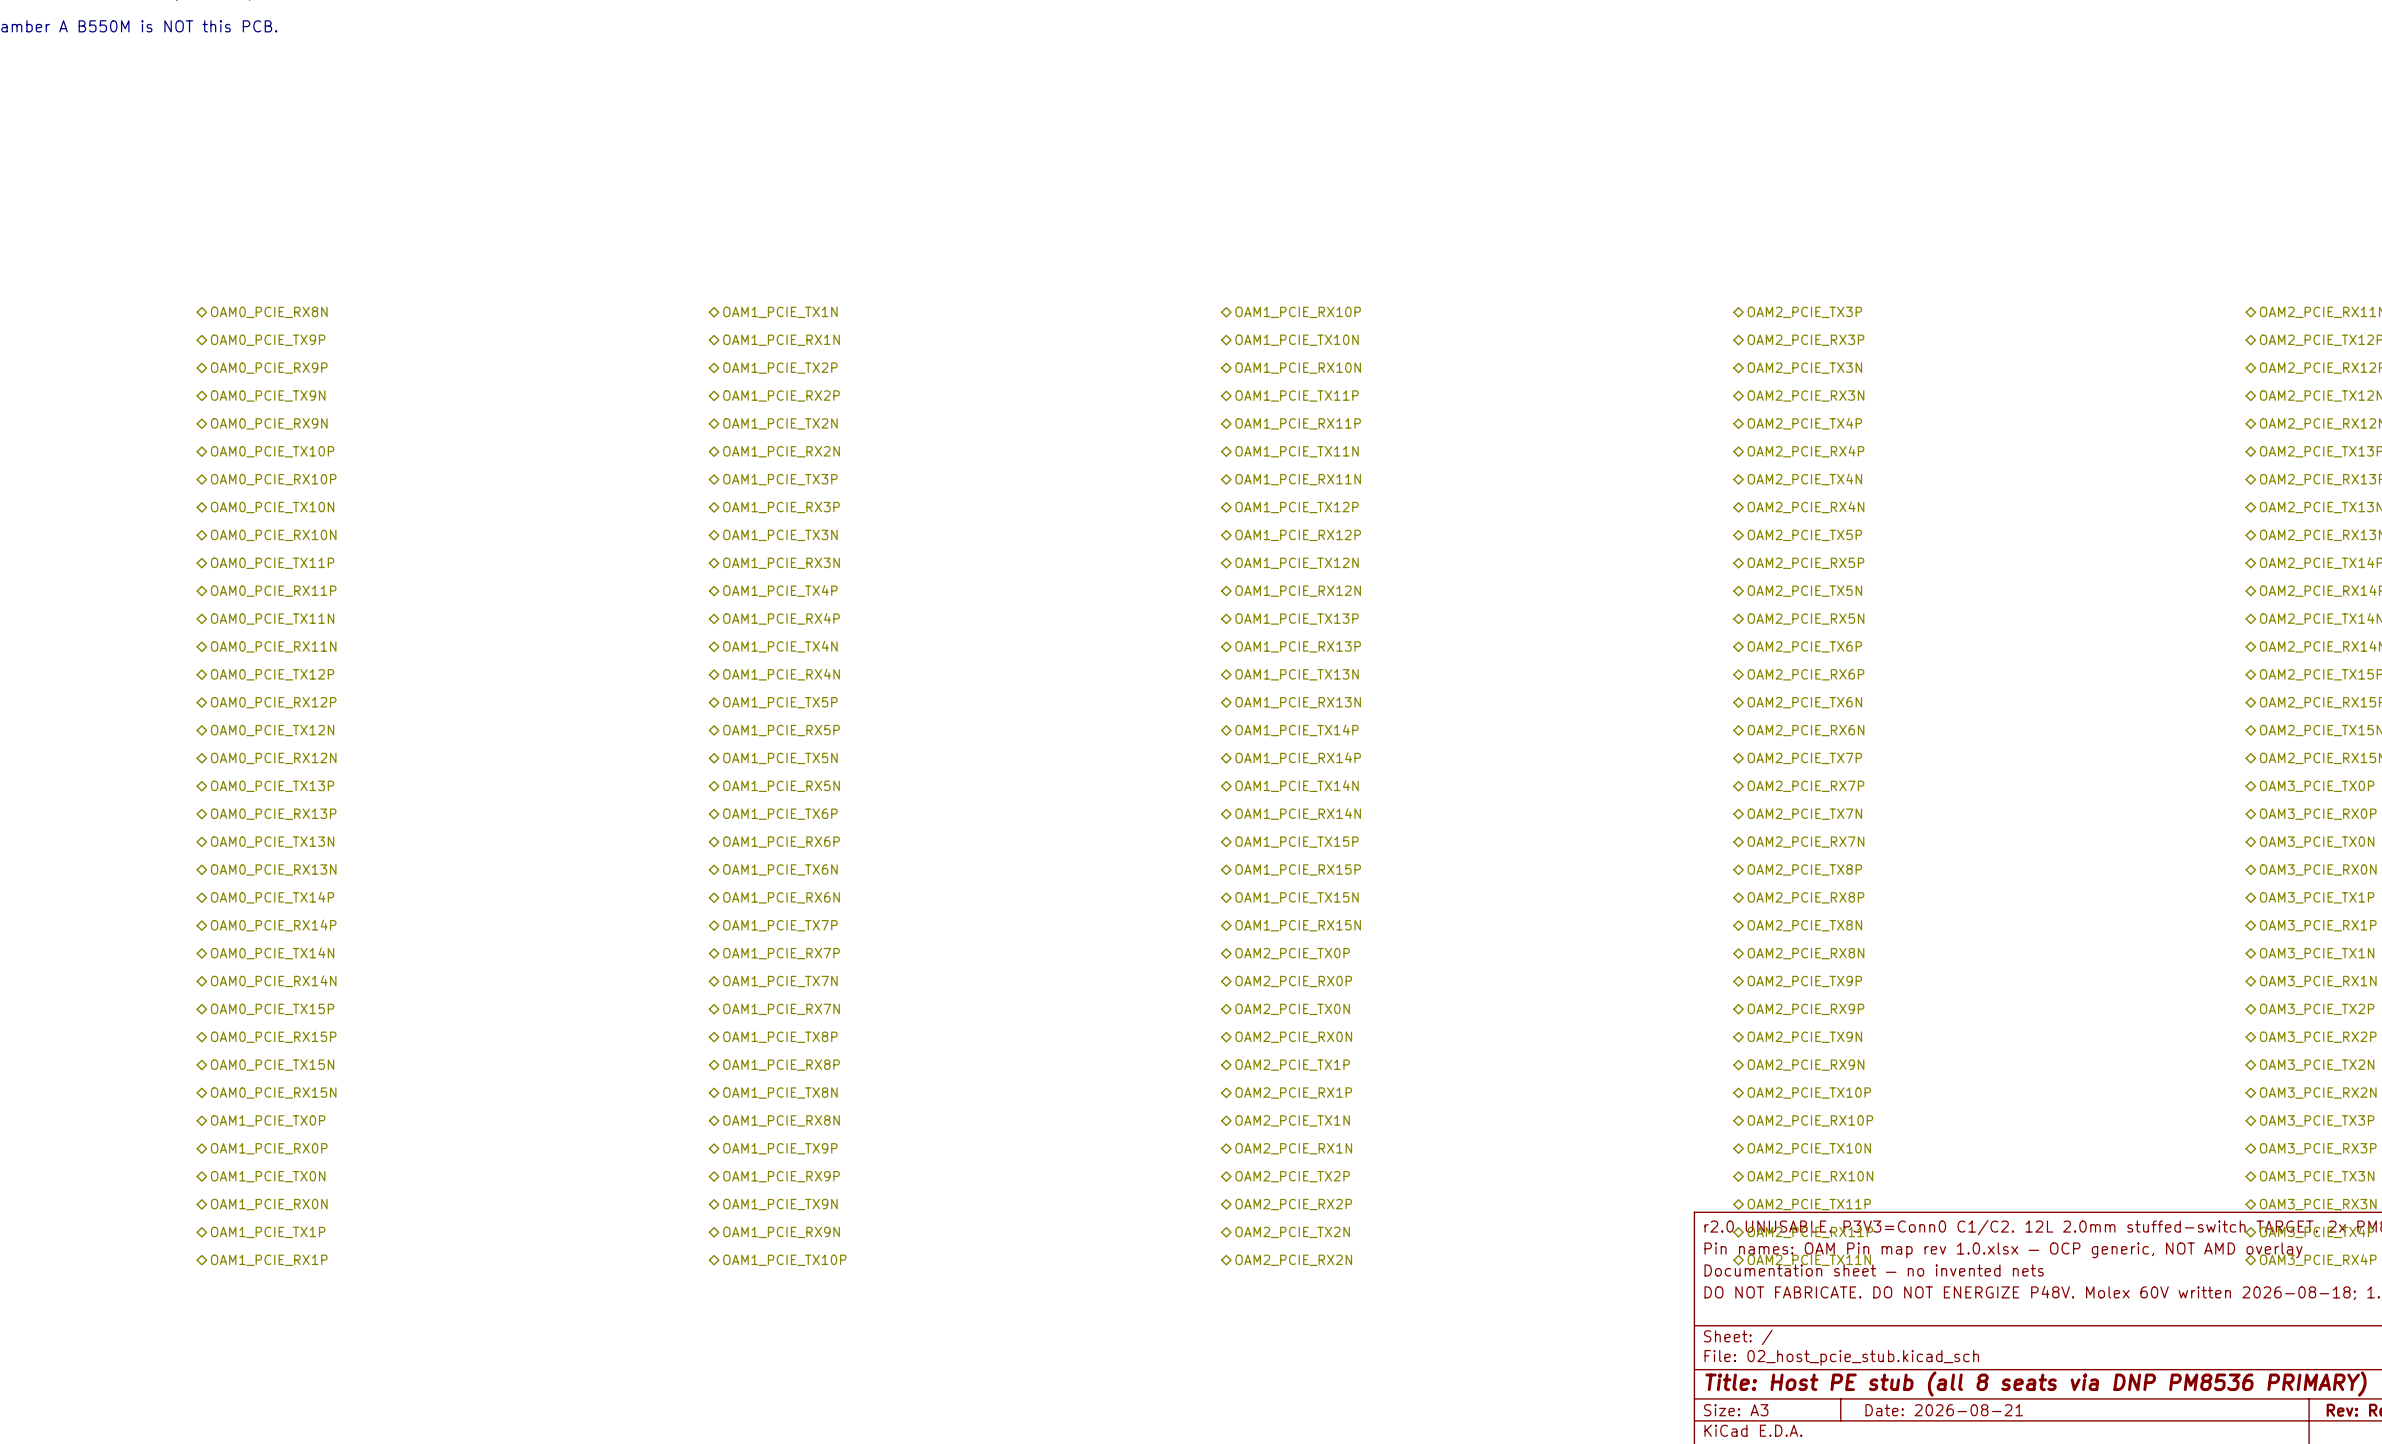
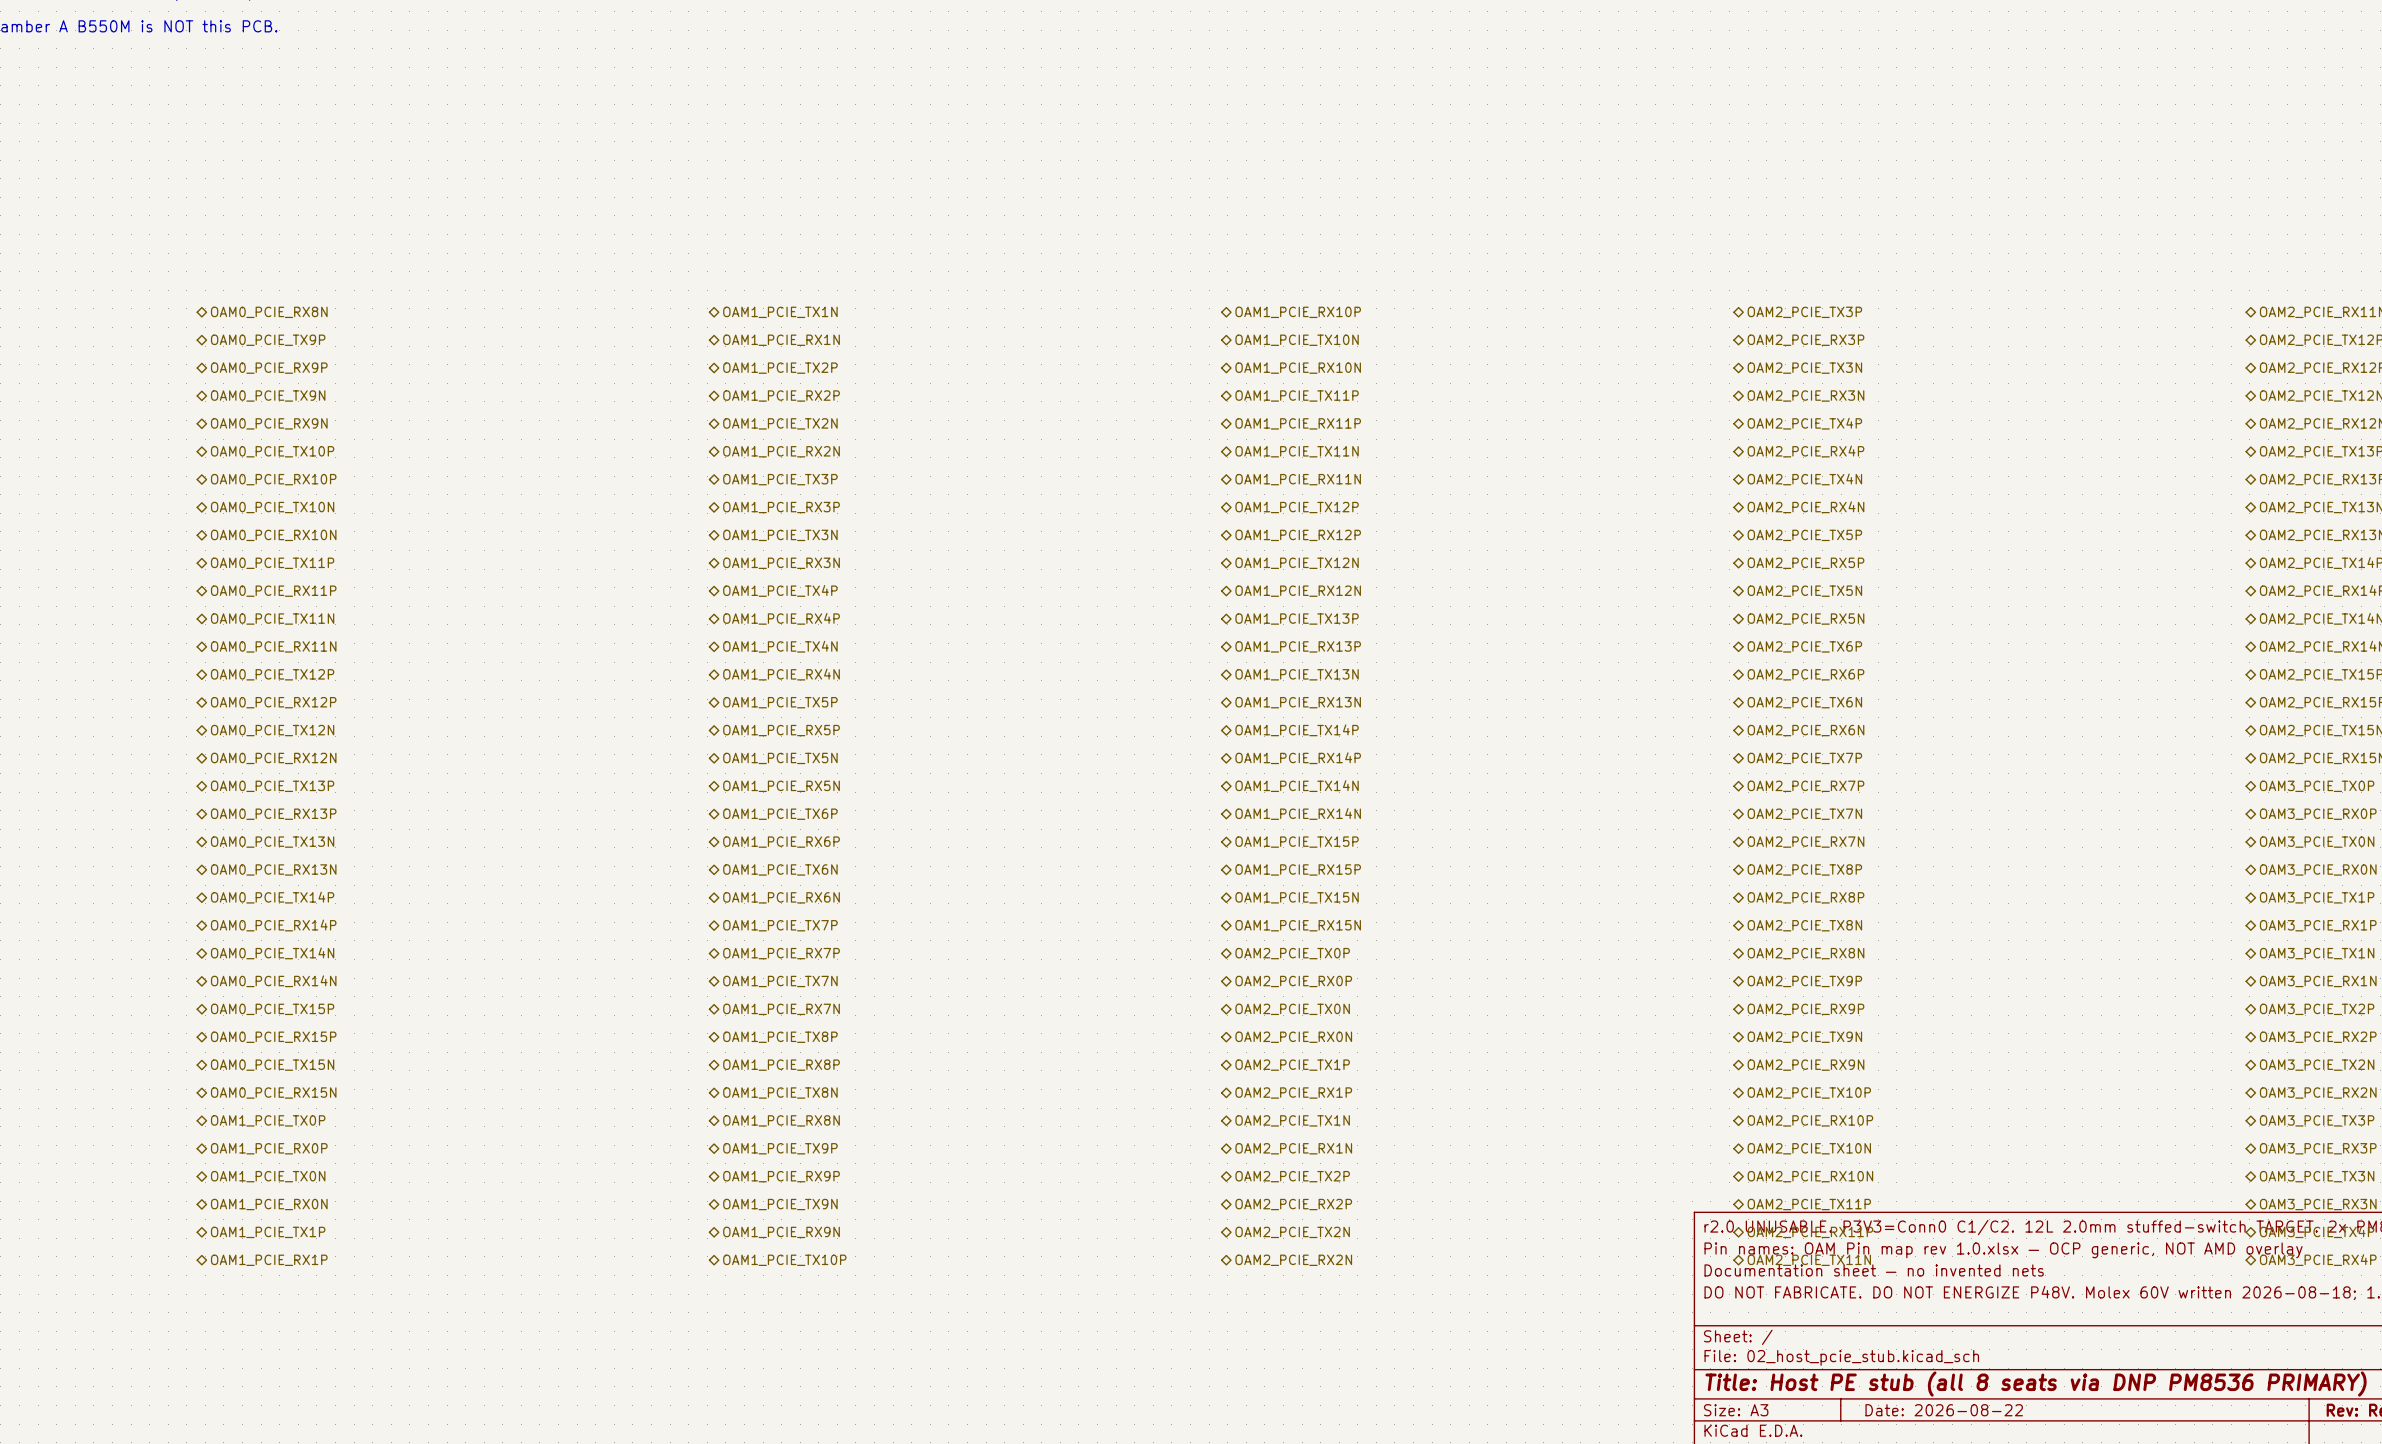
title block: Date: 2026-08-21 (1944, 1410) -> Date: 2026-08-22 (1944, 1410)

